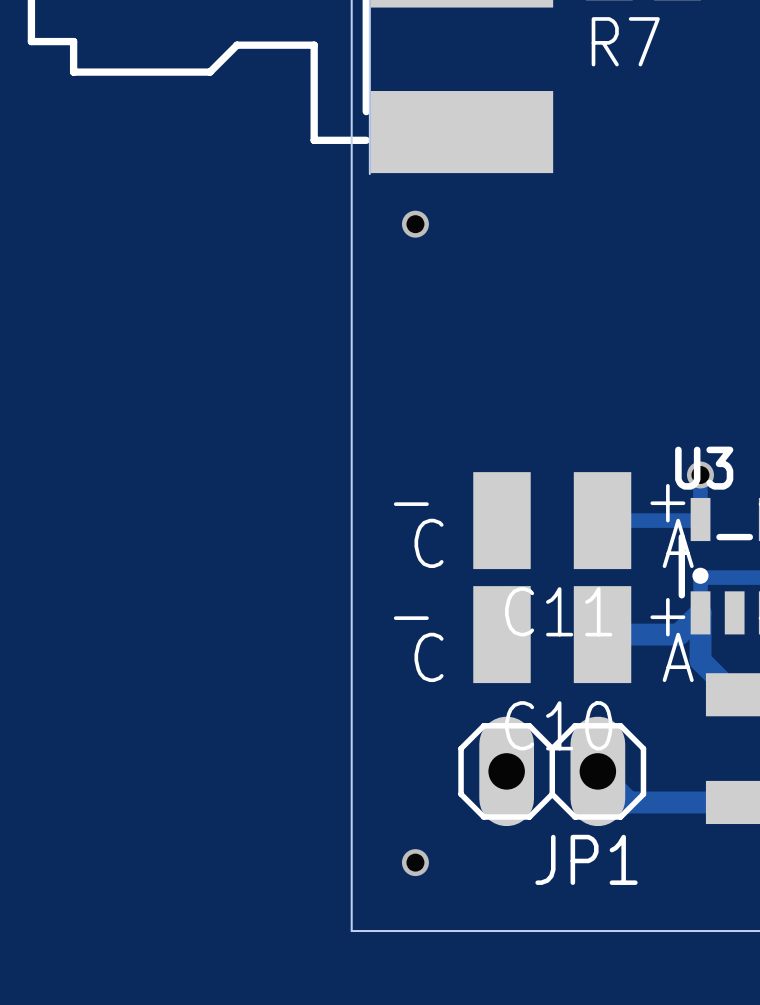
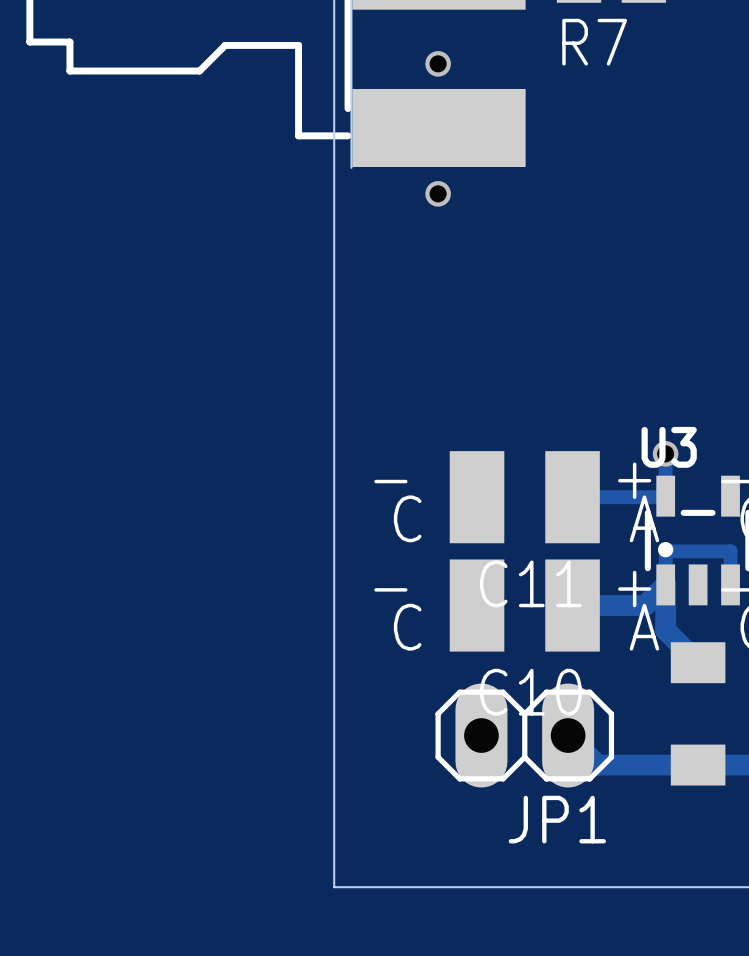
via: none -> (438, 63)
via position: (415, 224) -> (438, 193)
via: (415, 862) -> none

